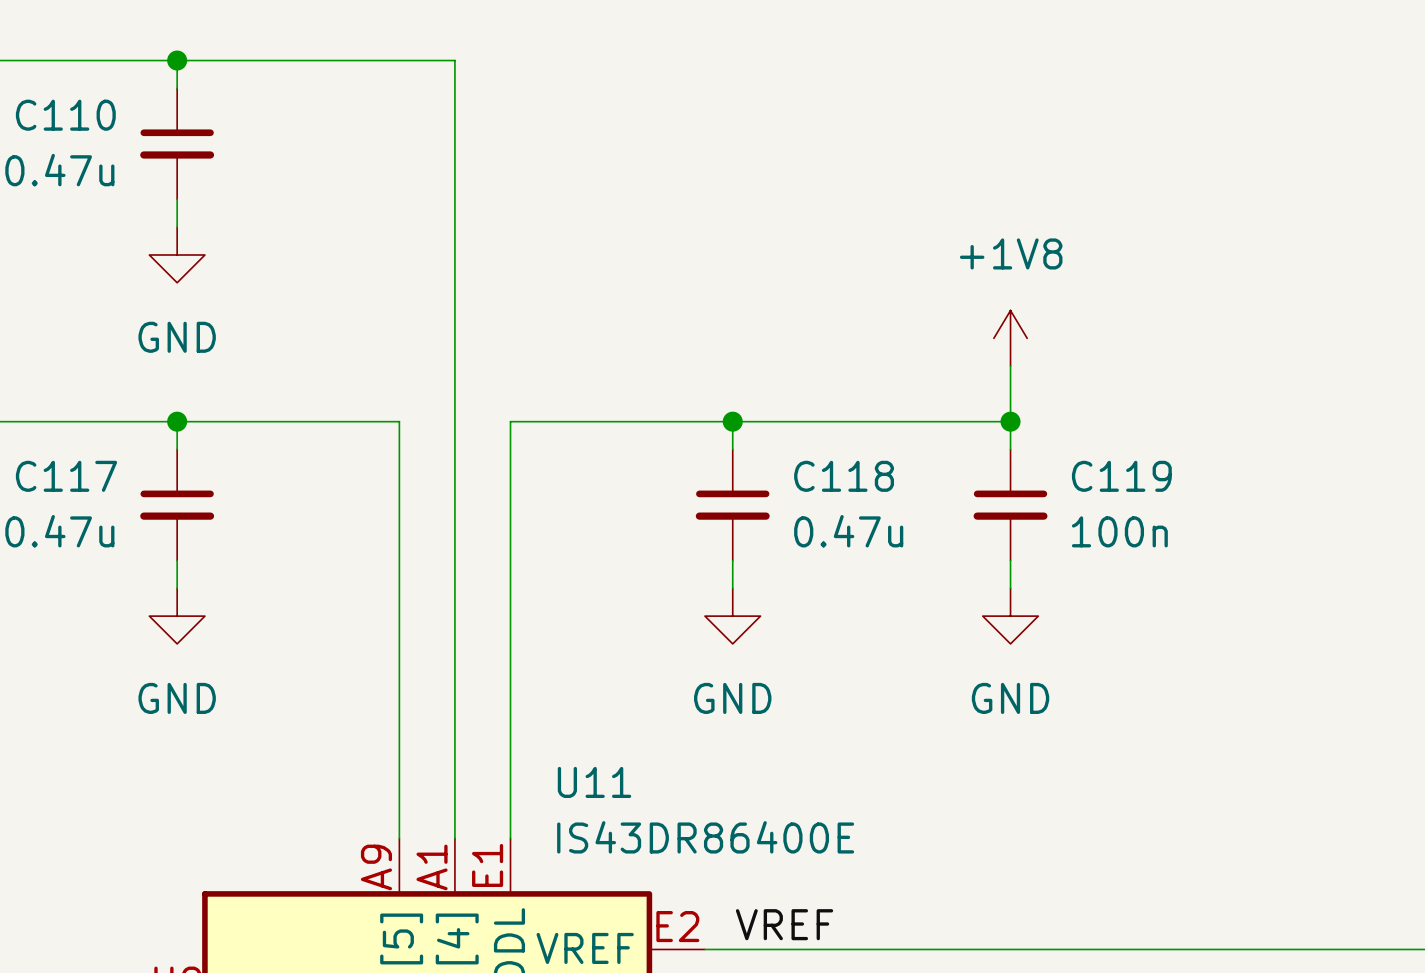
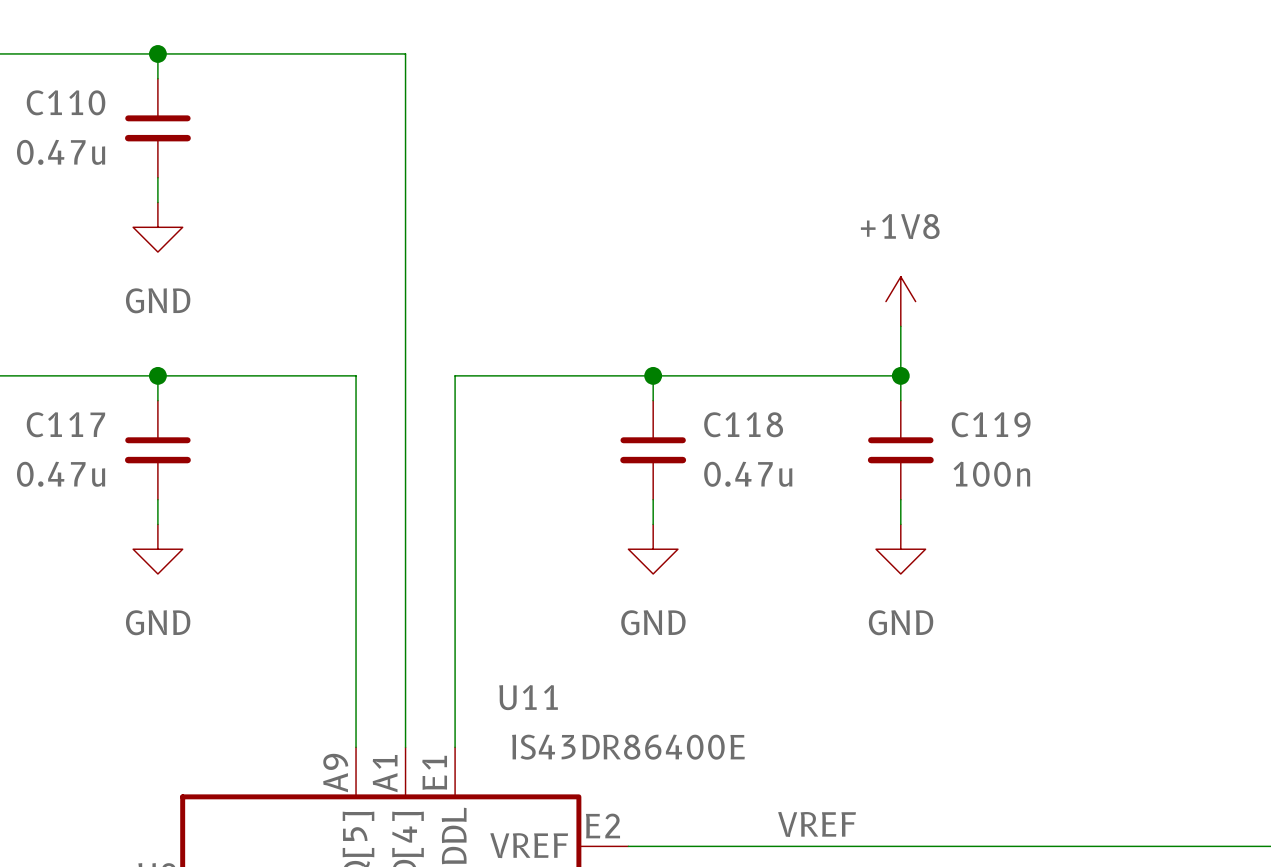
label position: VREF (784, 924) -> VREF (817, 824)

